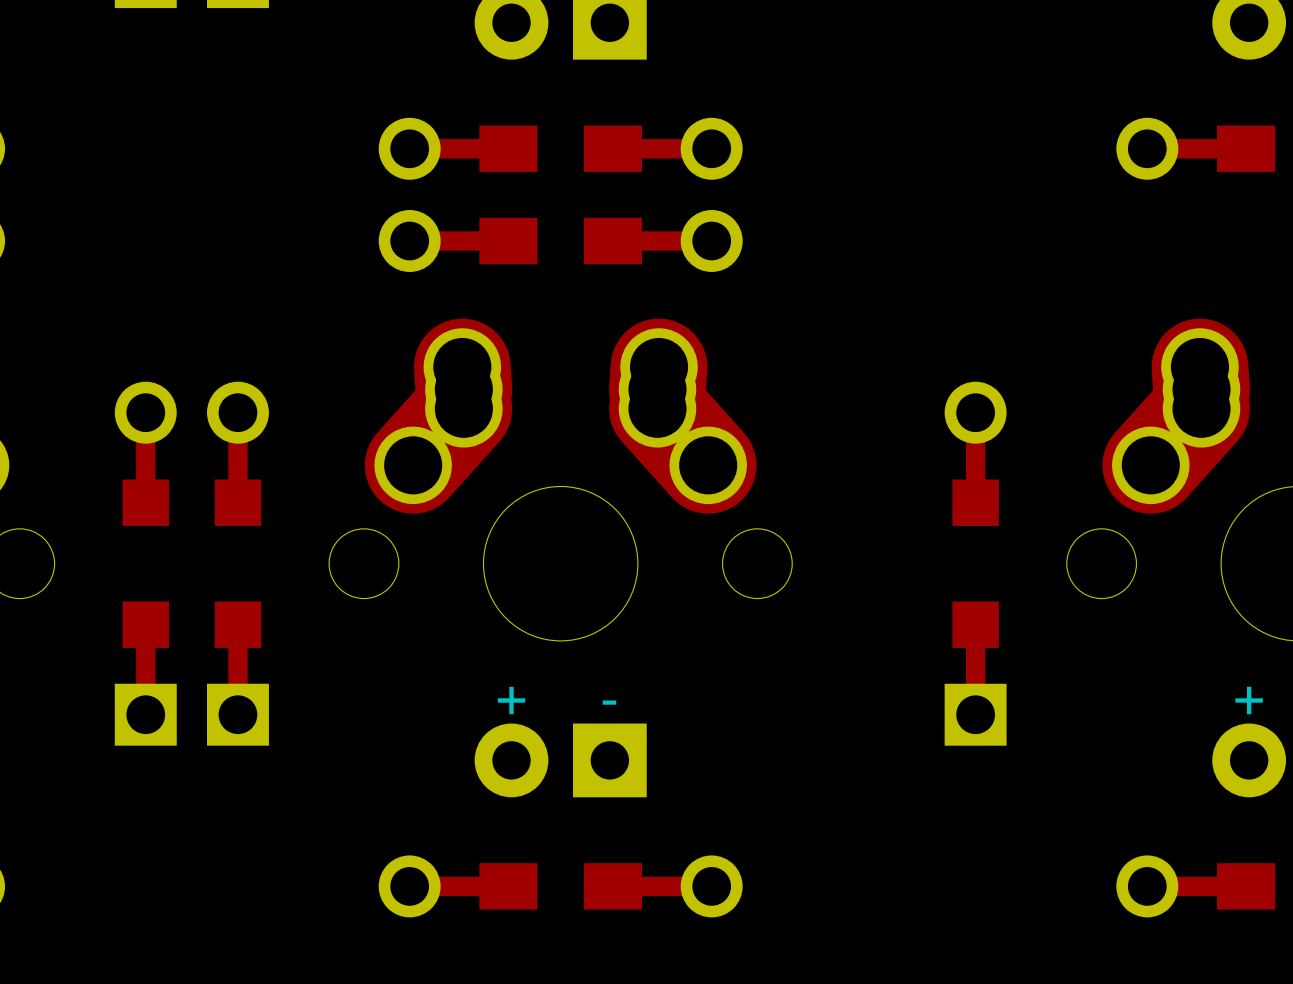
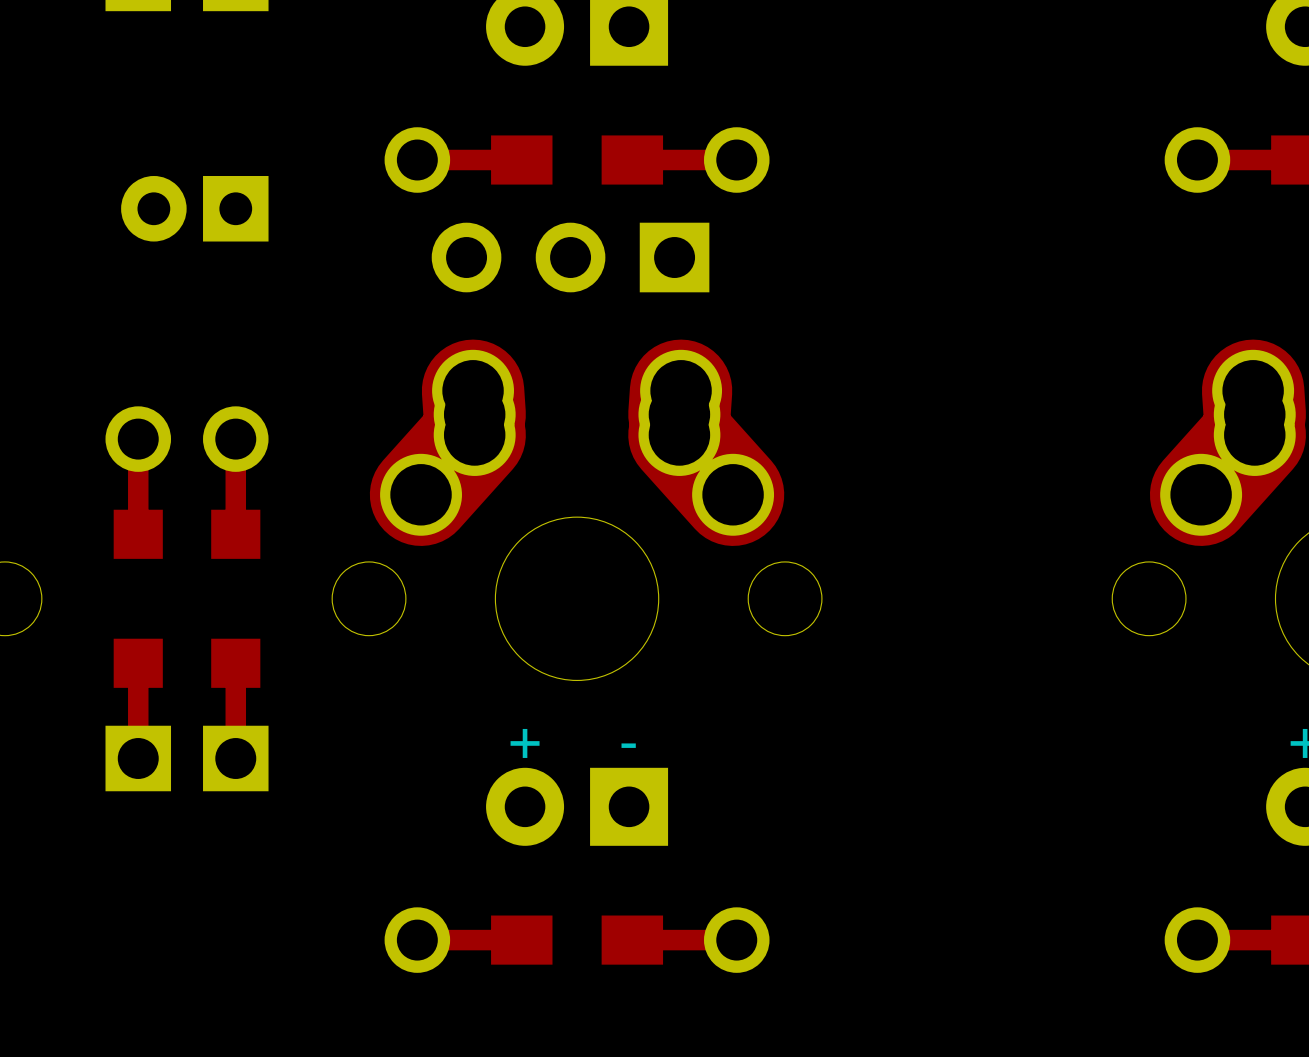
part: none -> (194, 208)
part footprint: [378, 210, 743, 272] -> [431, 222, 710, 293]
part: (975, 563) -> none

